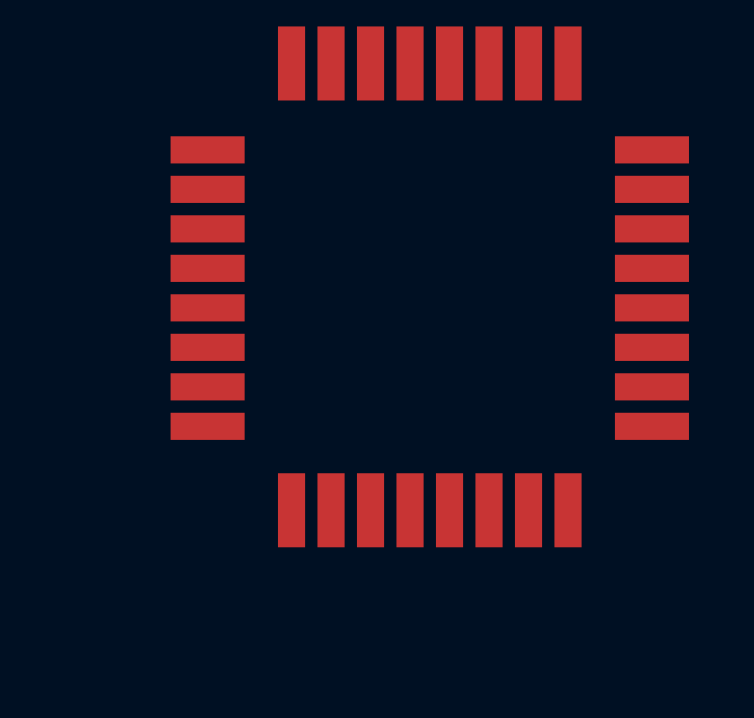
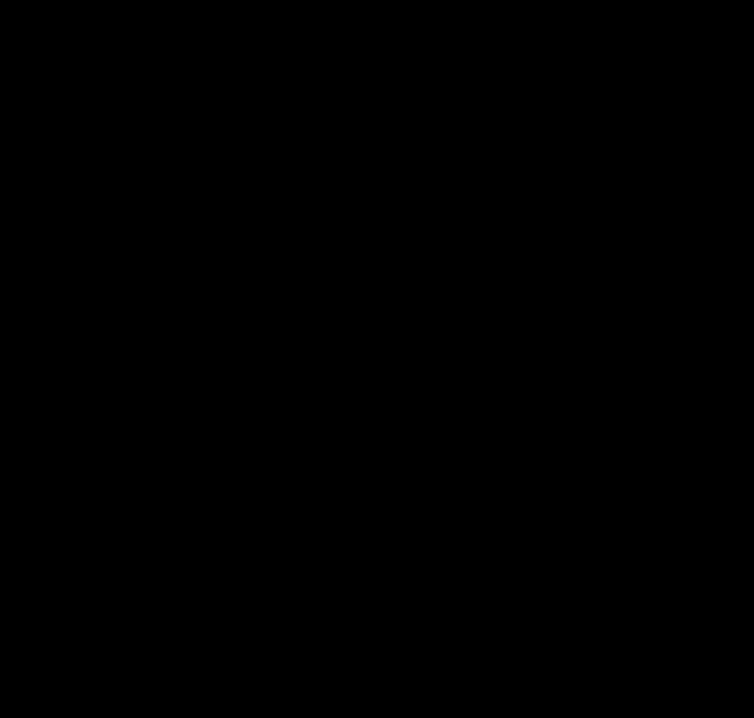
part: (429, 286) -> none

